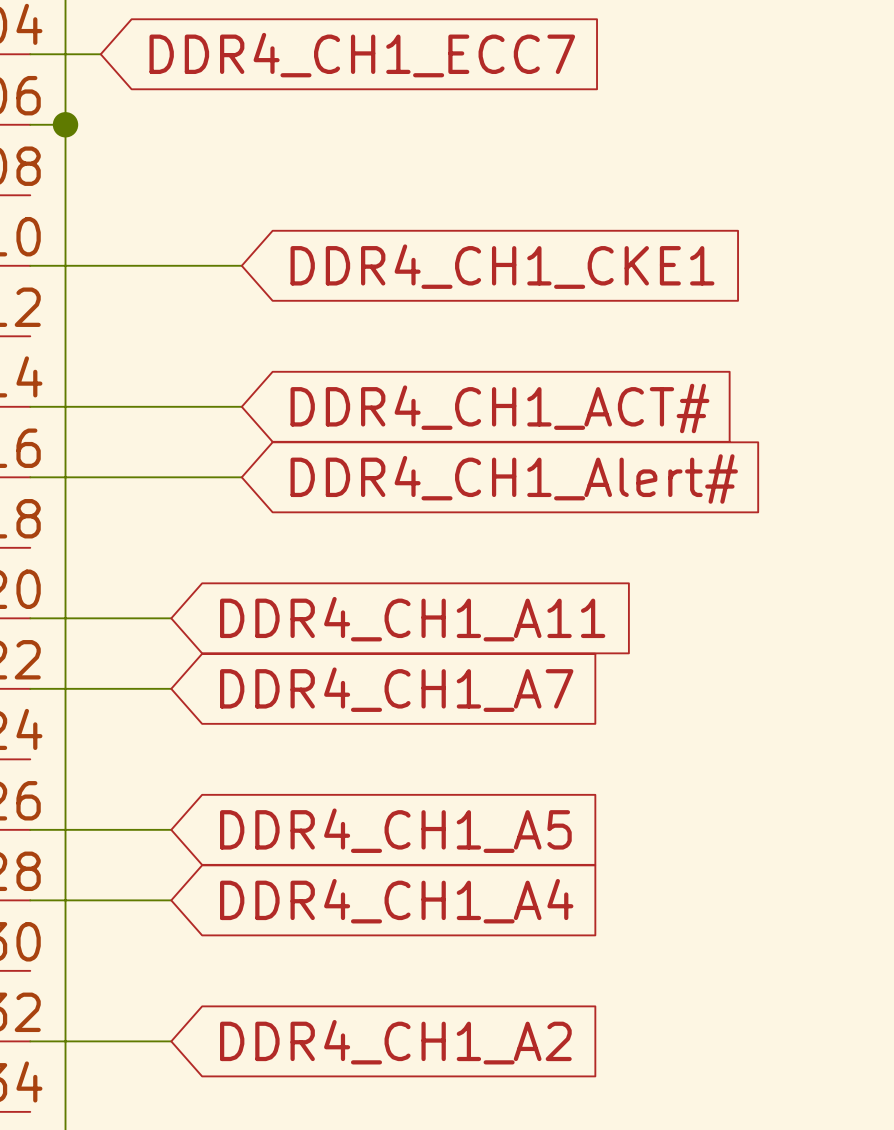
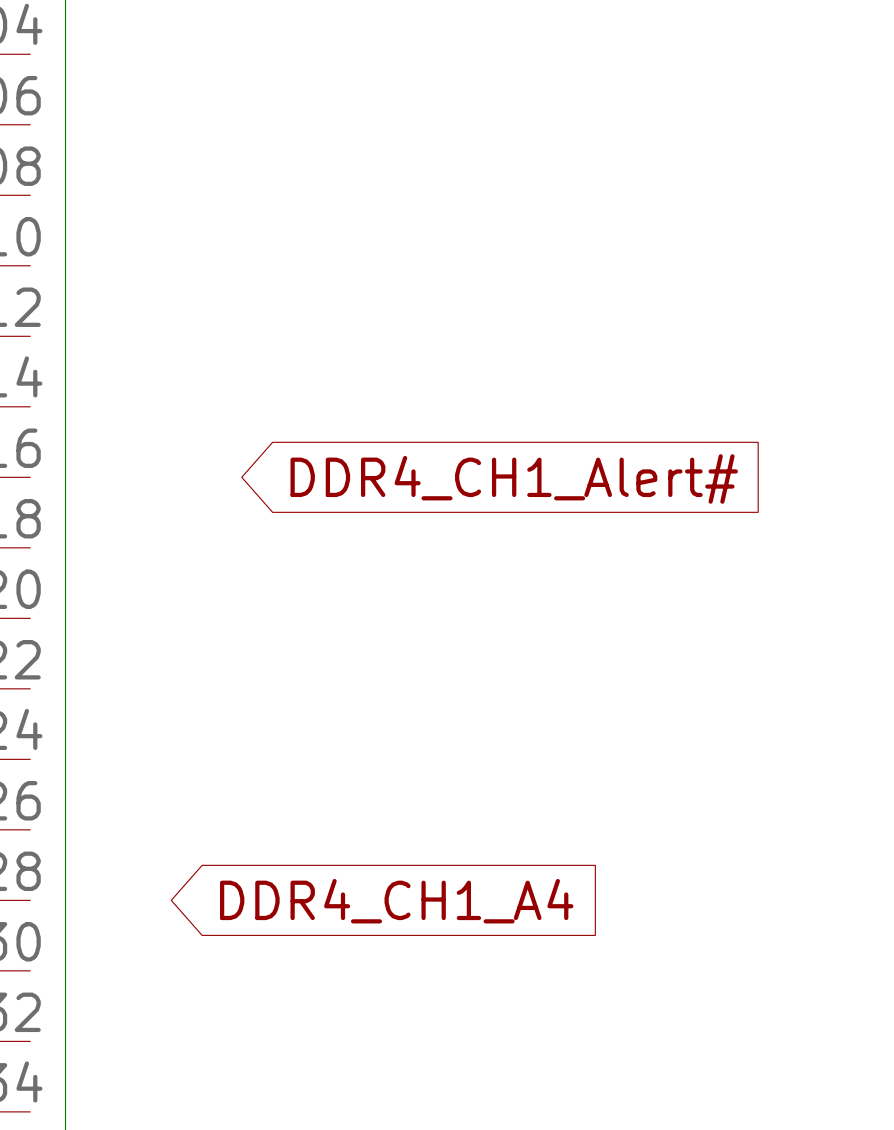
wire: (30, 54) (100, 54) -> none
global label: DDR4_CH1_ECC7 (362, 55) -> none
wire: (30, 124) (65, 124) -> none
junction: (65, 124) -> none
wire: (30, 265) (241, 265) -> none
global label: DDR4_CH1_CKE1 (502, 266) -> none
wire: (30, 406) (241, 406) -> none
global label: DDR4_CH1_ACT# (499, 408) -> none
wire: (30, 477) (241, 477) -> none
wire: (30, 618) (171, 618) -> none
global label: DDR4_CH1_A11 (412, 619) -> none
wire: (30, 688) (171, 688) -> none
global label: DDR4_CH1_A7 (396, 689) -> none
wire: (30, 829) (171, 829) -> none
global label: DDR4_CH1_A5 (395, 830) -> none
wire: (30, 900) (171, 900) -> none
wire: (30, 1041) (171, 1041) -> none
global label: DDR4_CH1_A2 (395, 1042) -> none

